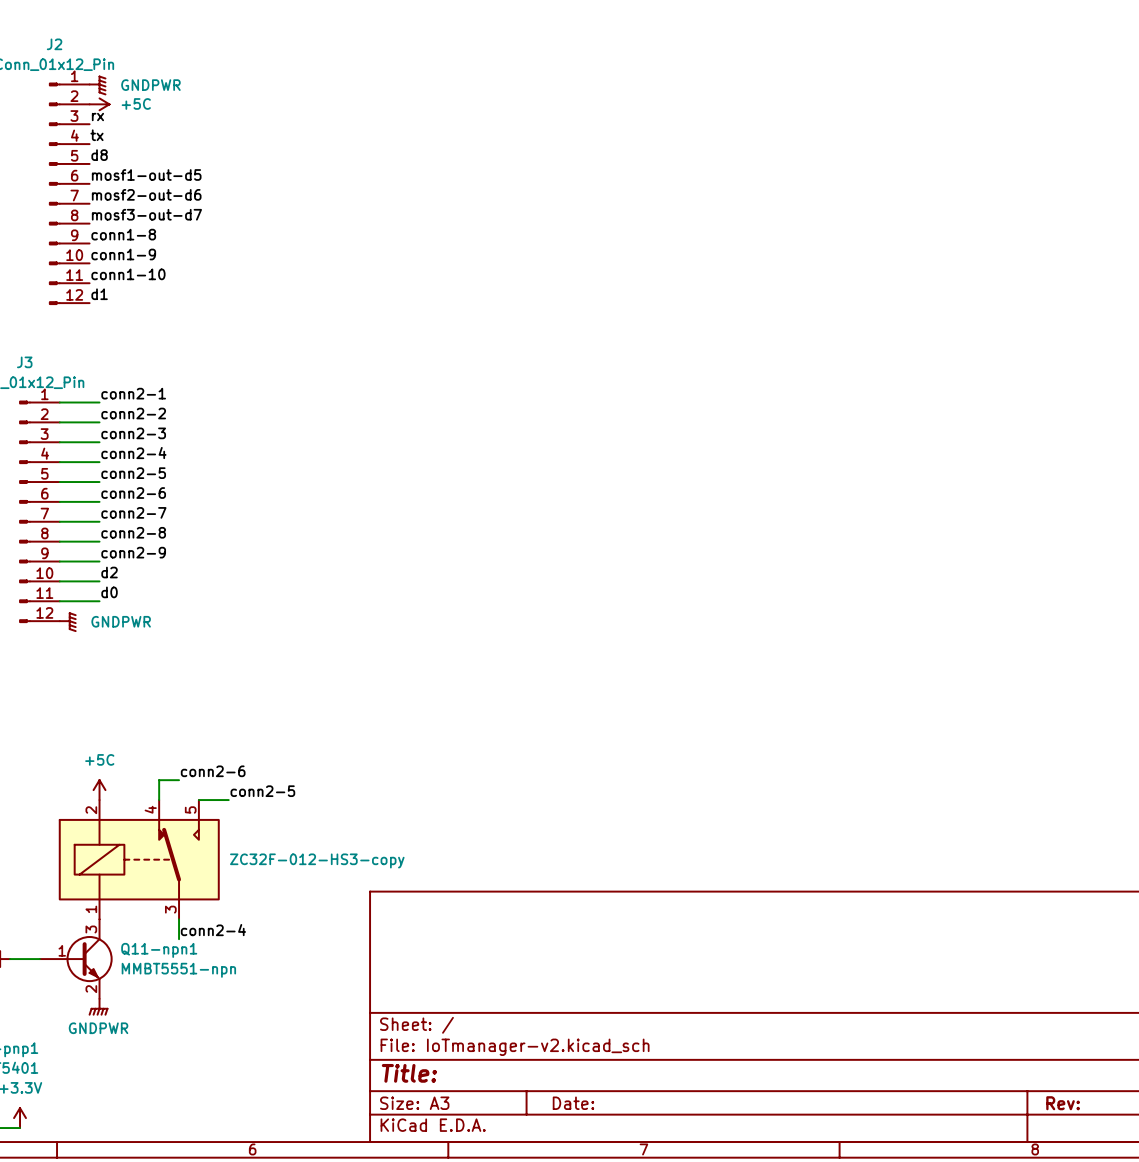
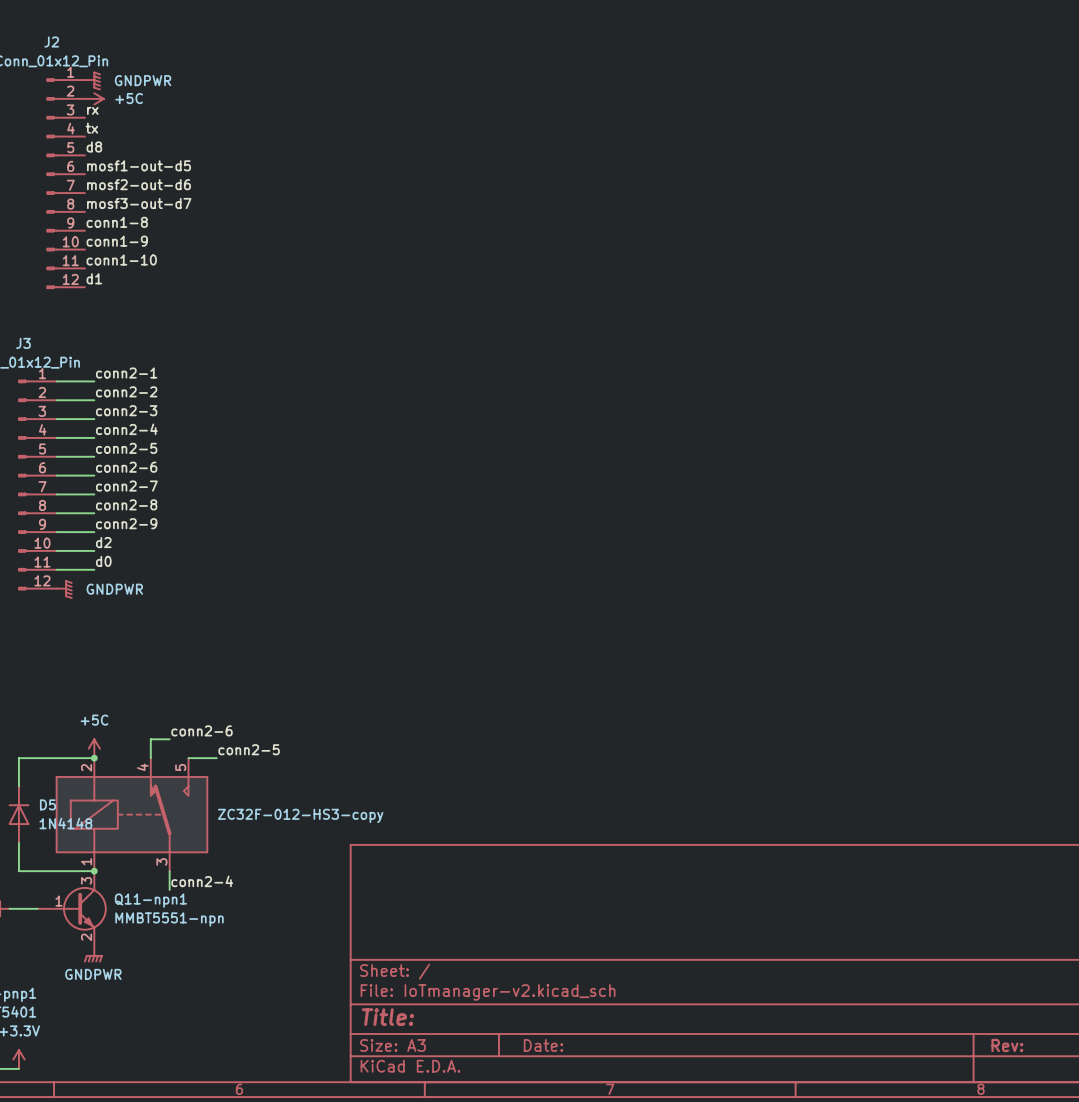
wire: none -> (94, 758) (18, 758) (18, 786)
junction: none -> (94, 758)
D5: none -> 1N4148 (18, 814)
wire: none -> (18, 842) (18, 871) (94, 871)
junction: none -> (94, 871)

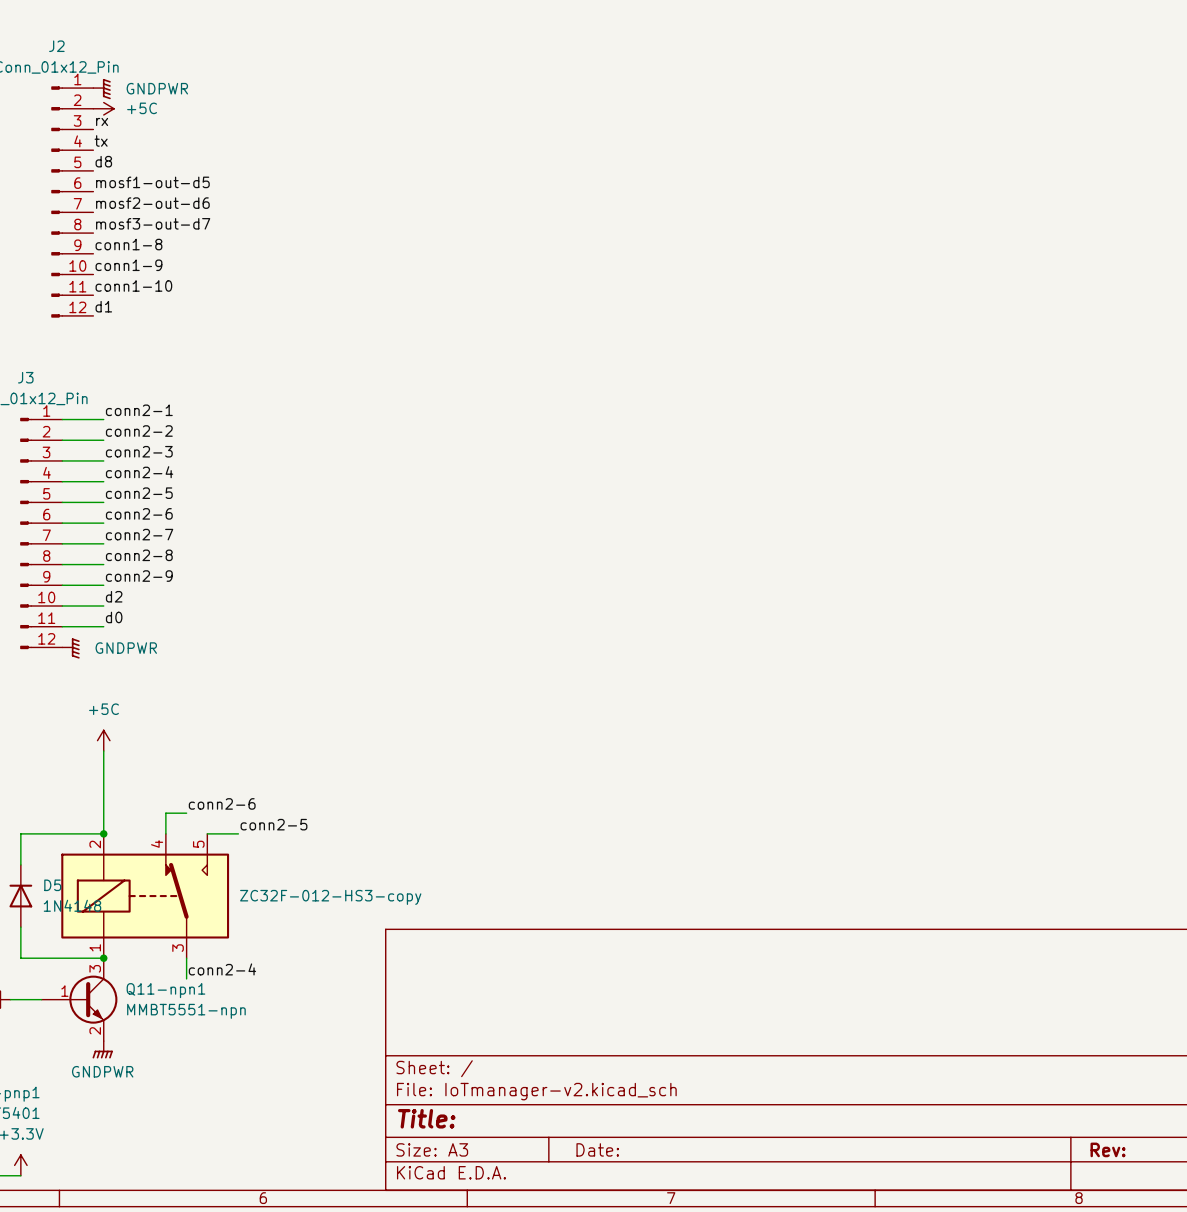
wire: none -> (103, 751) (103, 833)
power symbol position: +5C (94, 748) -> +5C (103, 740)

